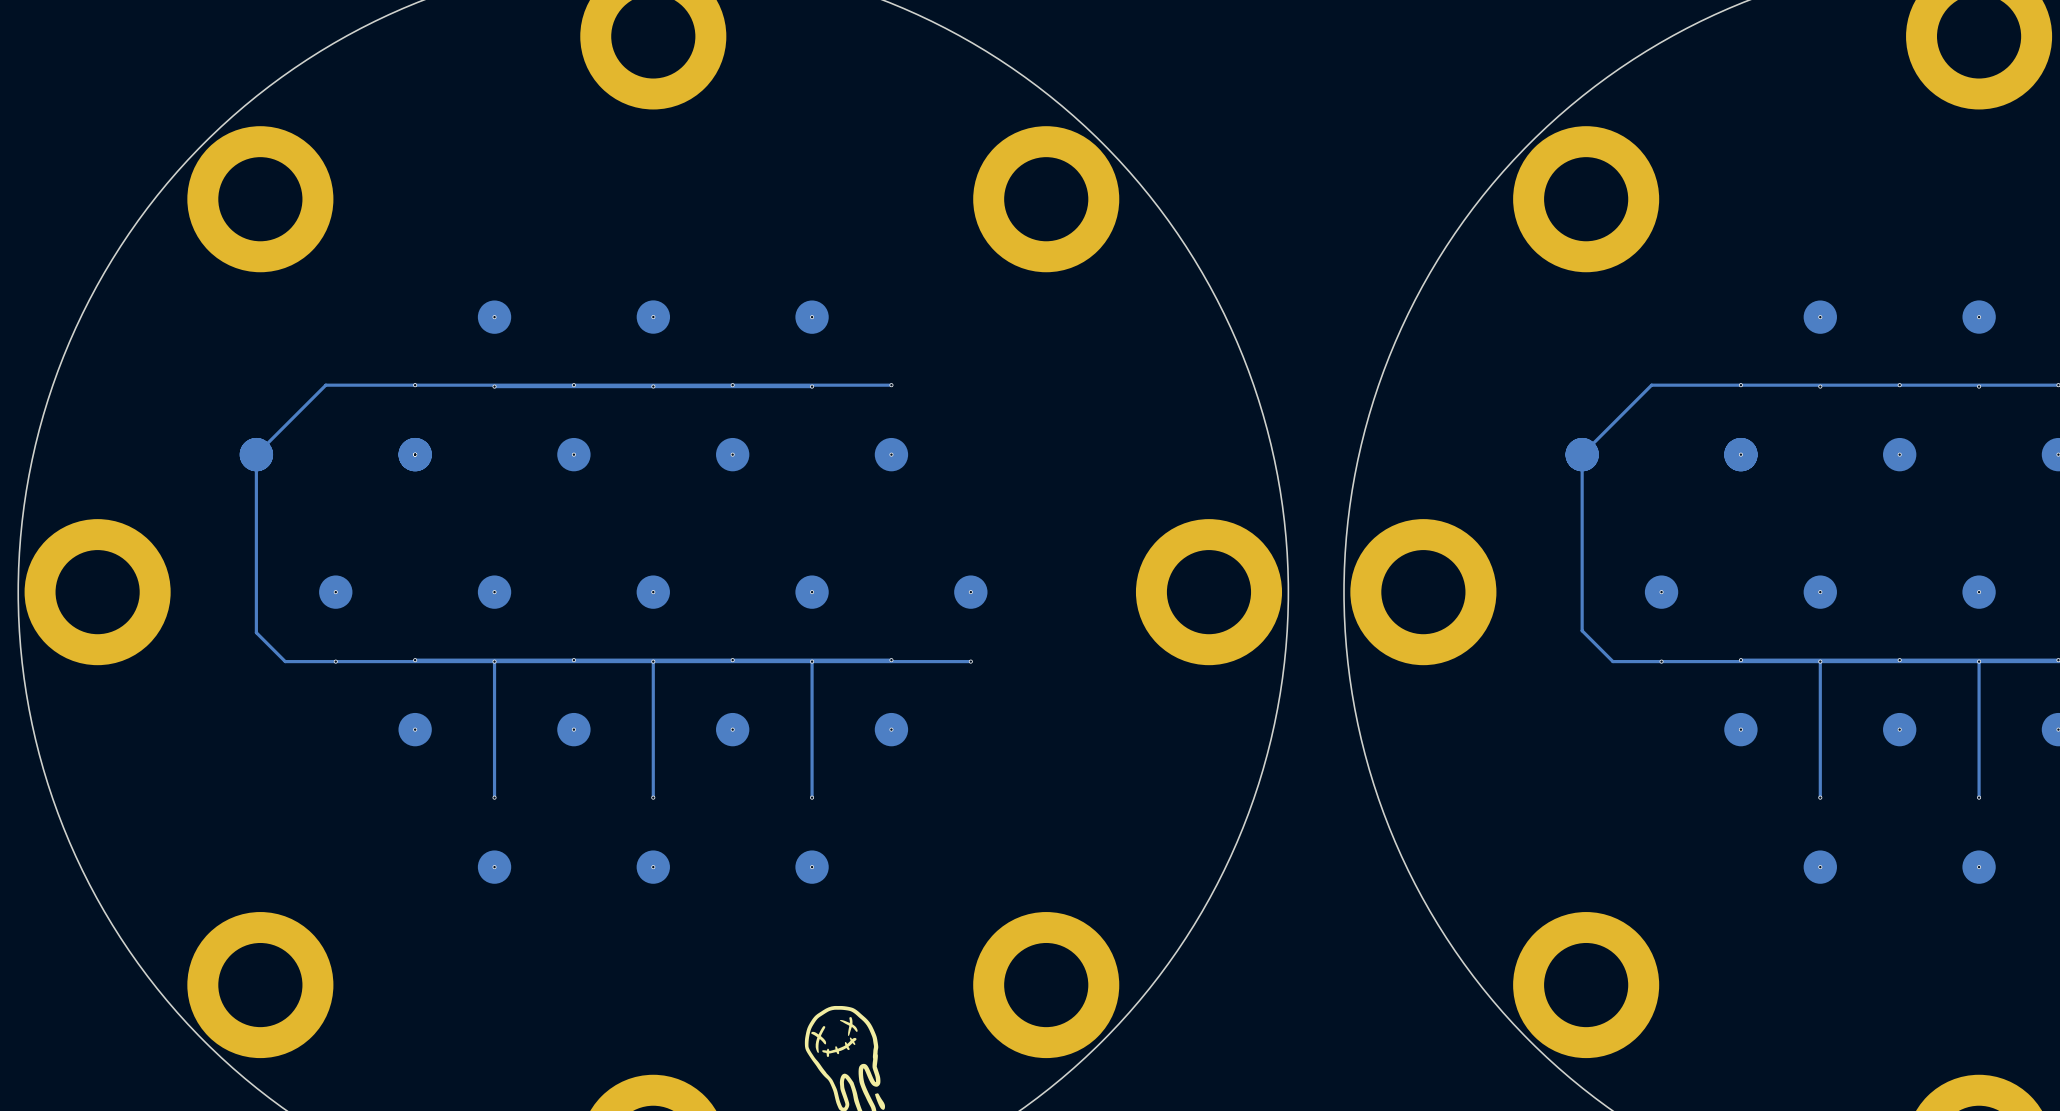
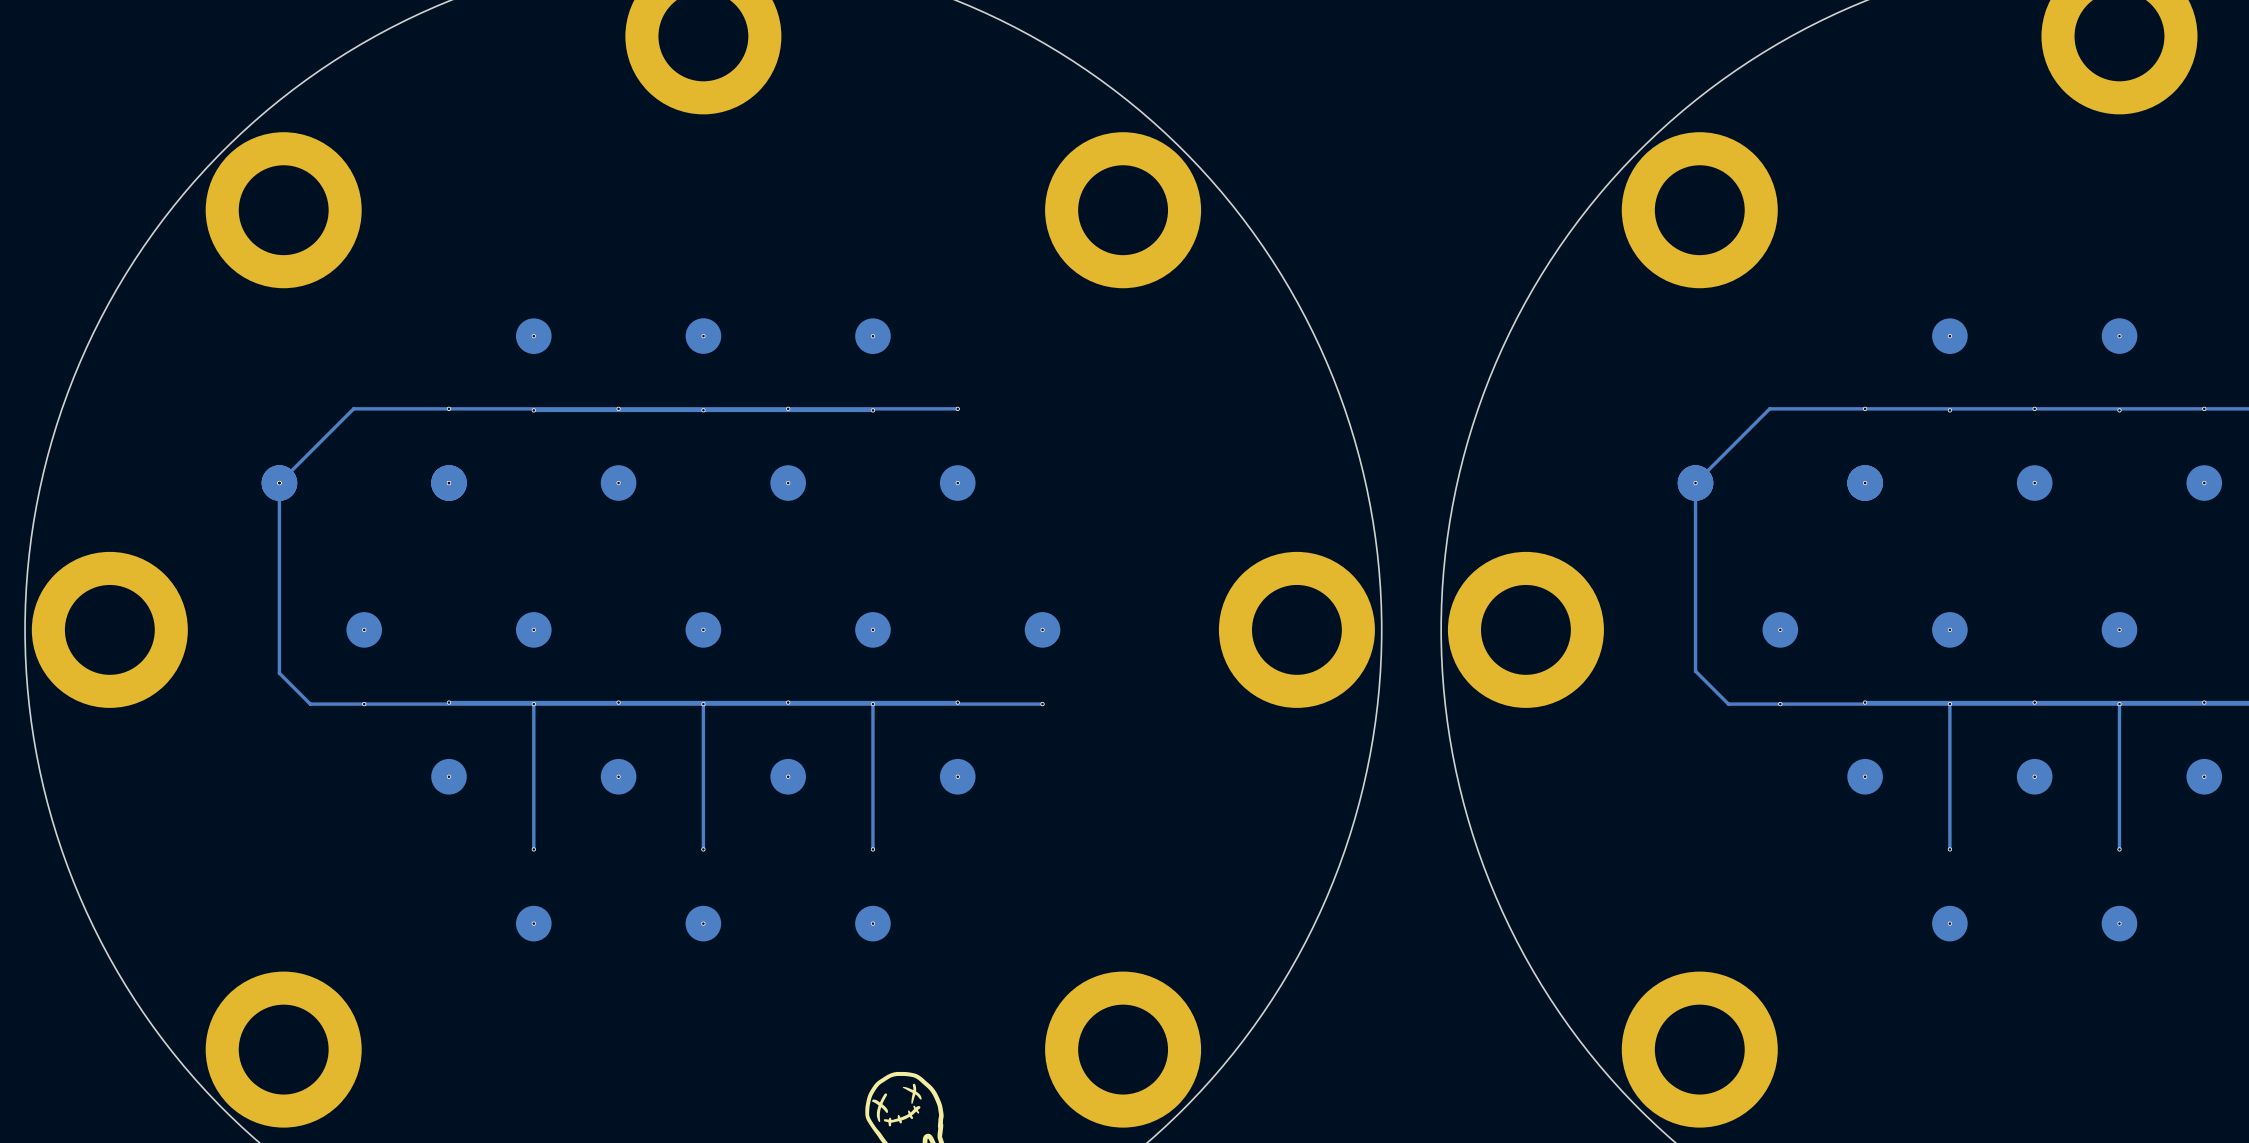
via: none -> (279, 483)
via: none -> (1695, 483)

